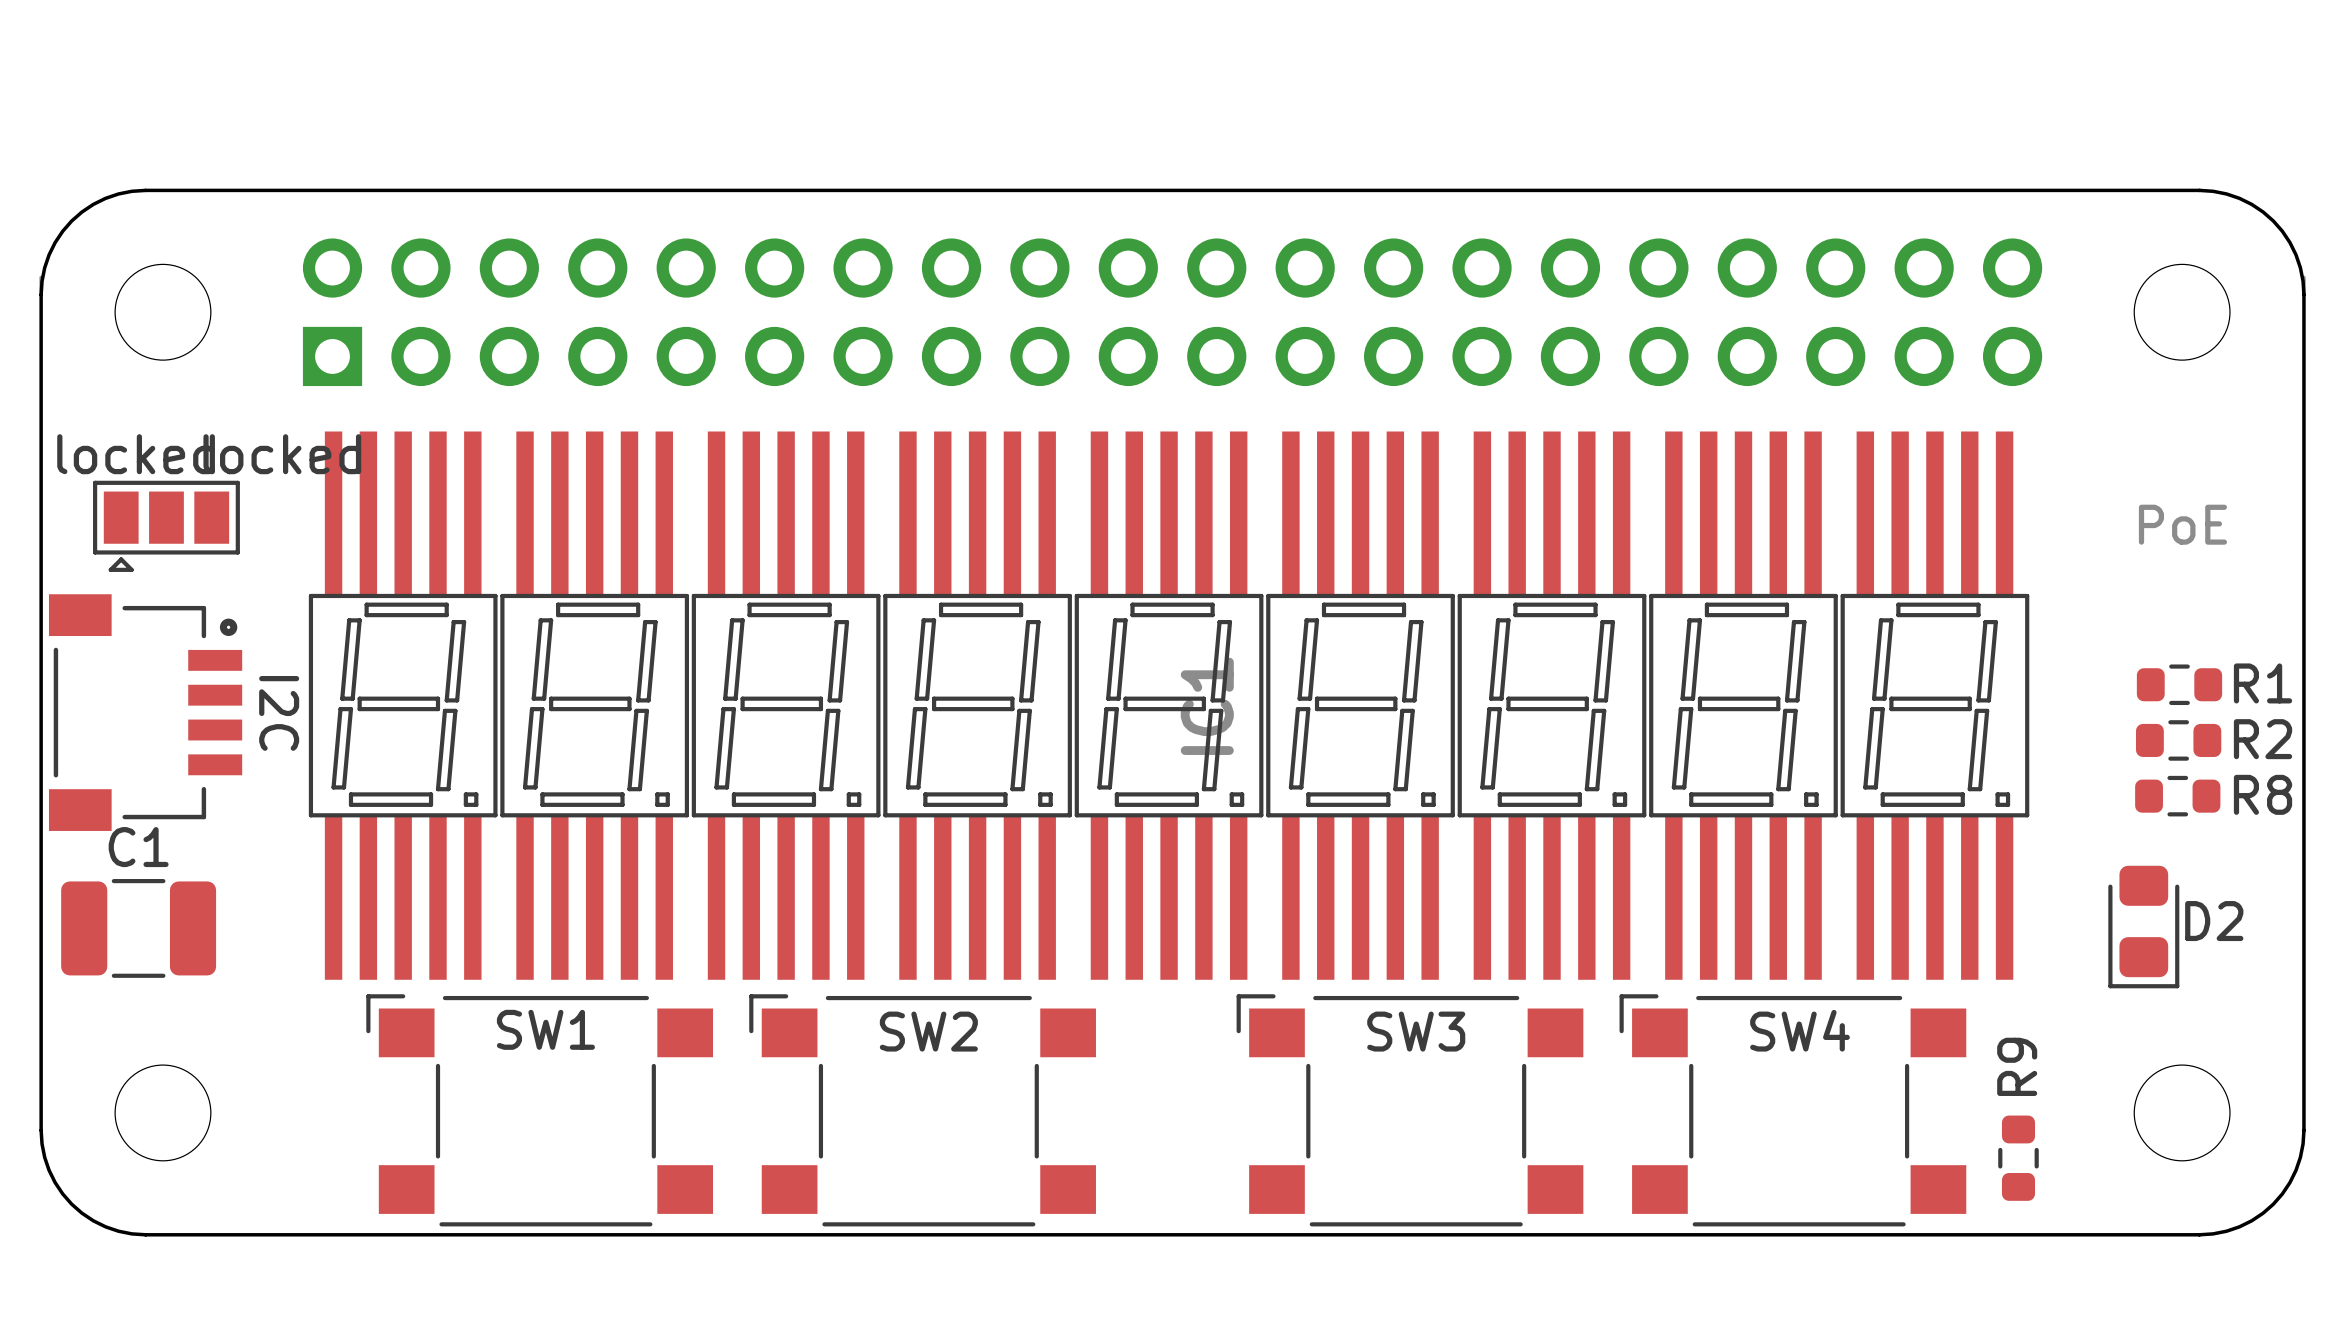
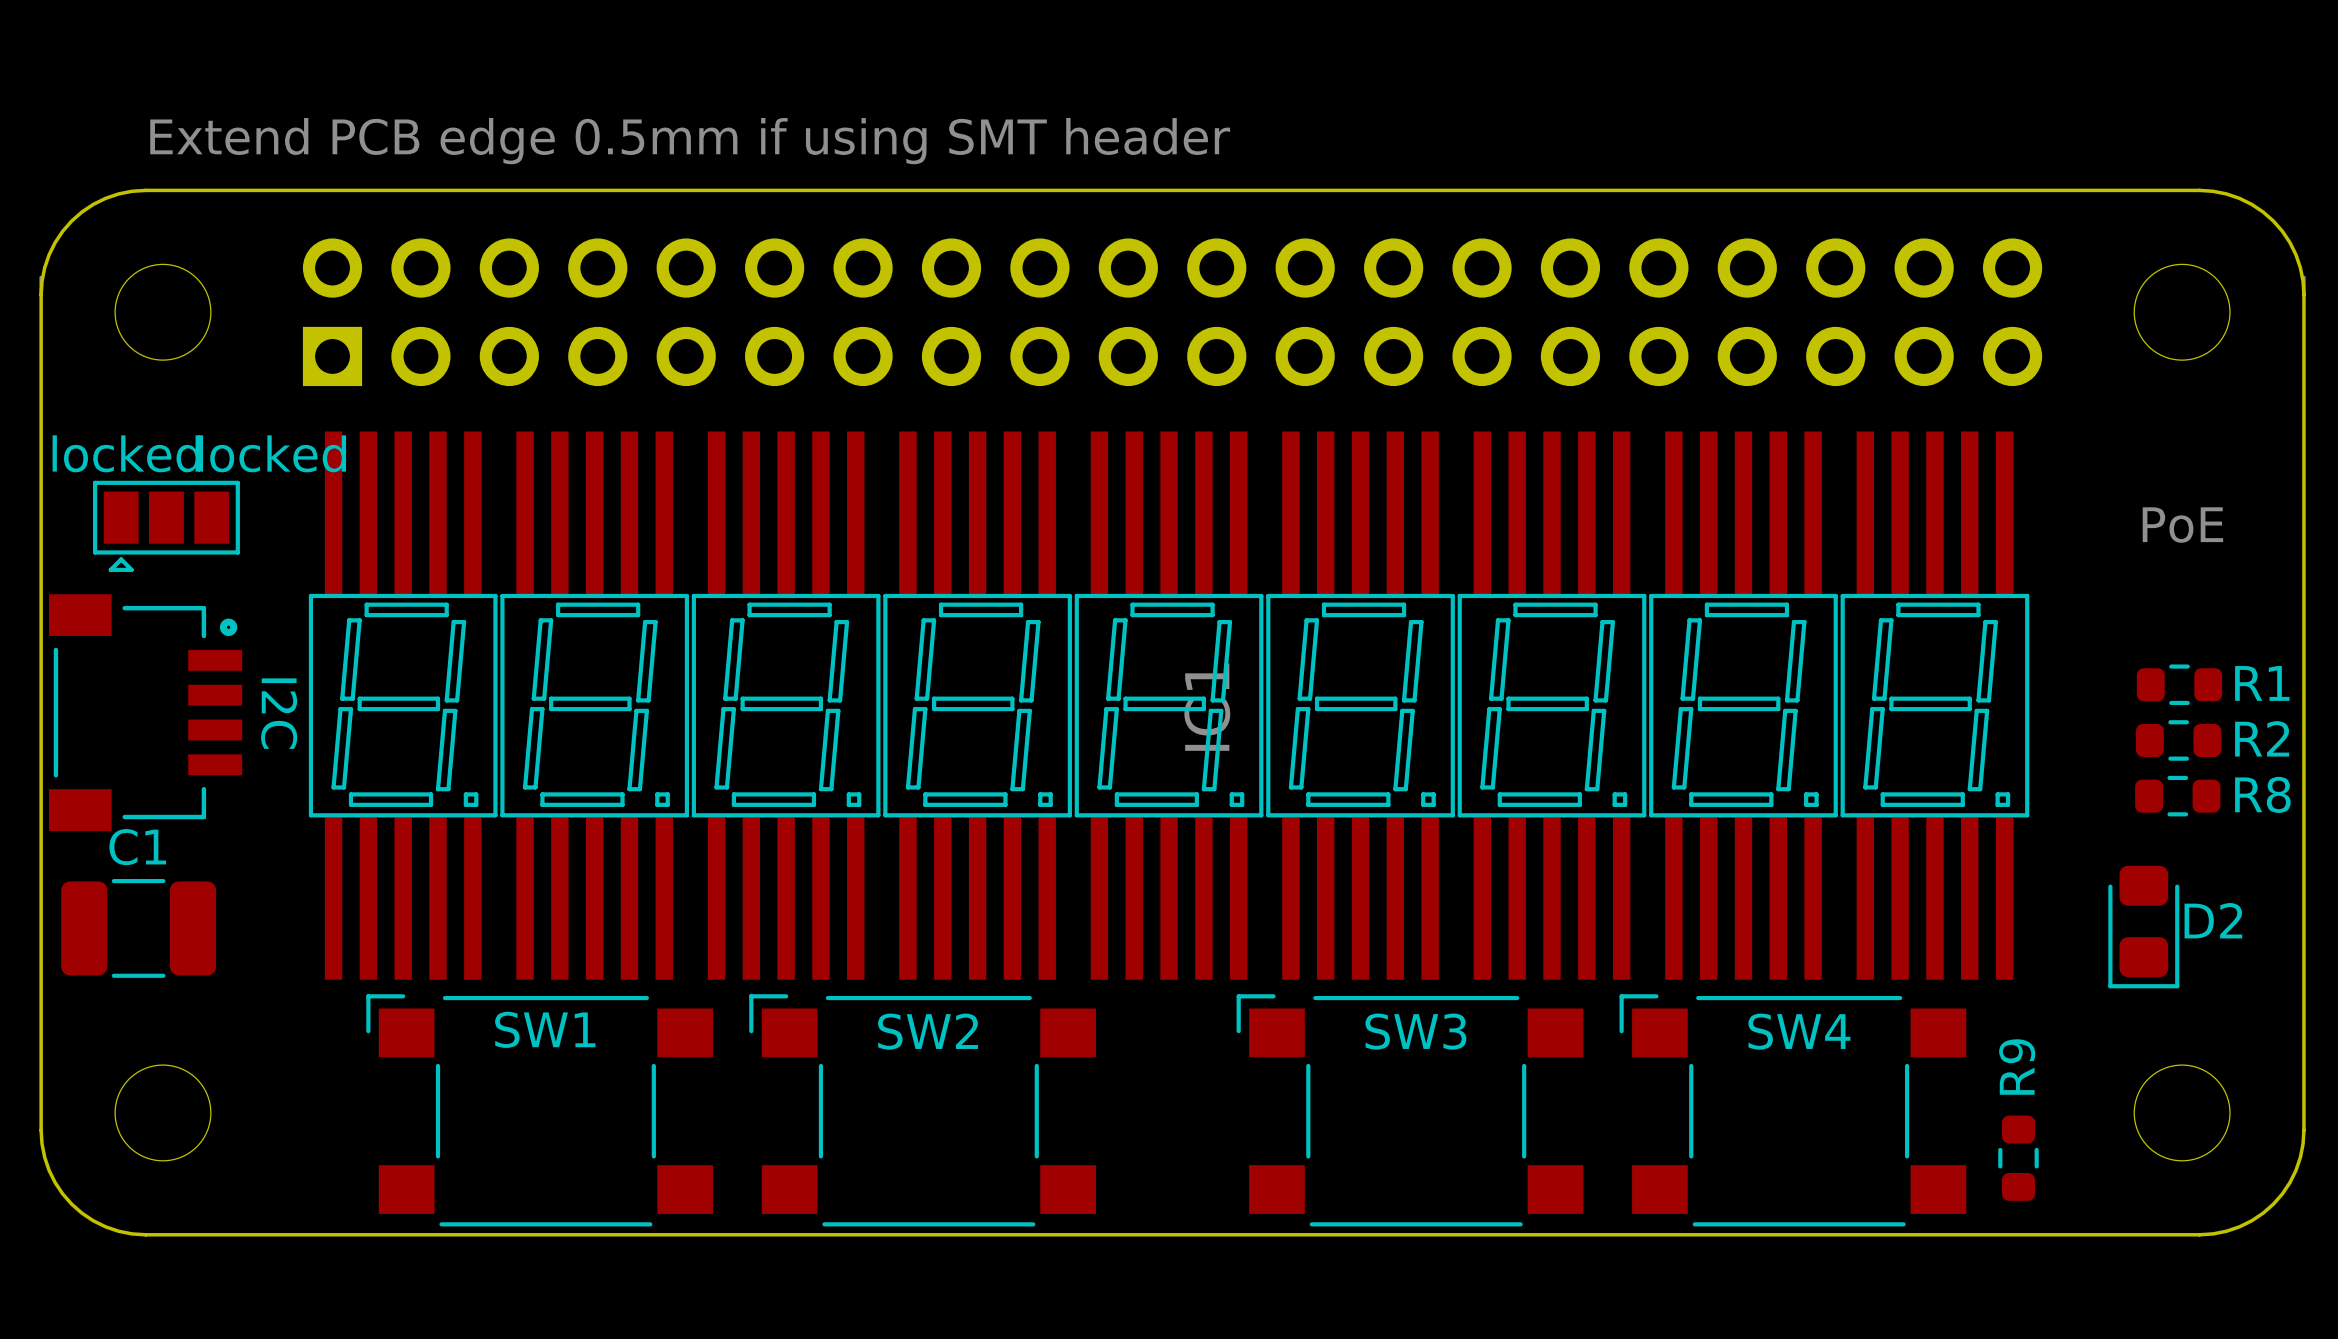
text: none -> Extend PCB edge 0.5mm if using SMT header (690, 141)

